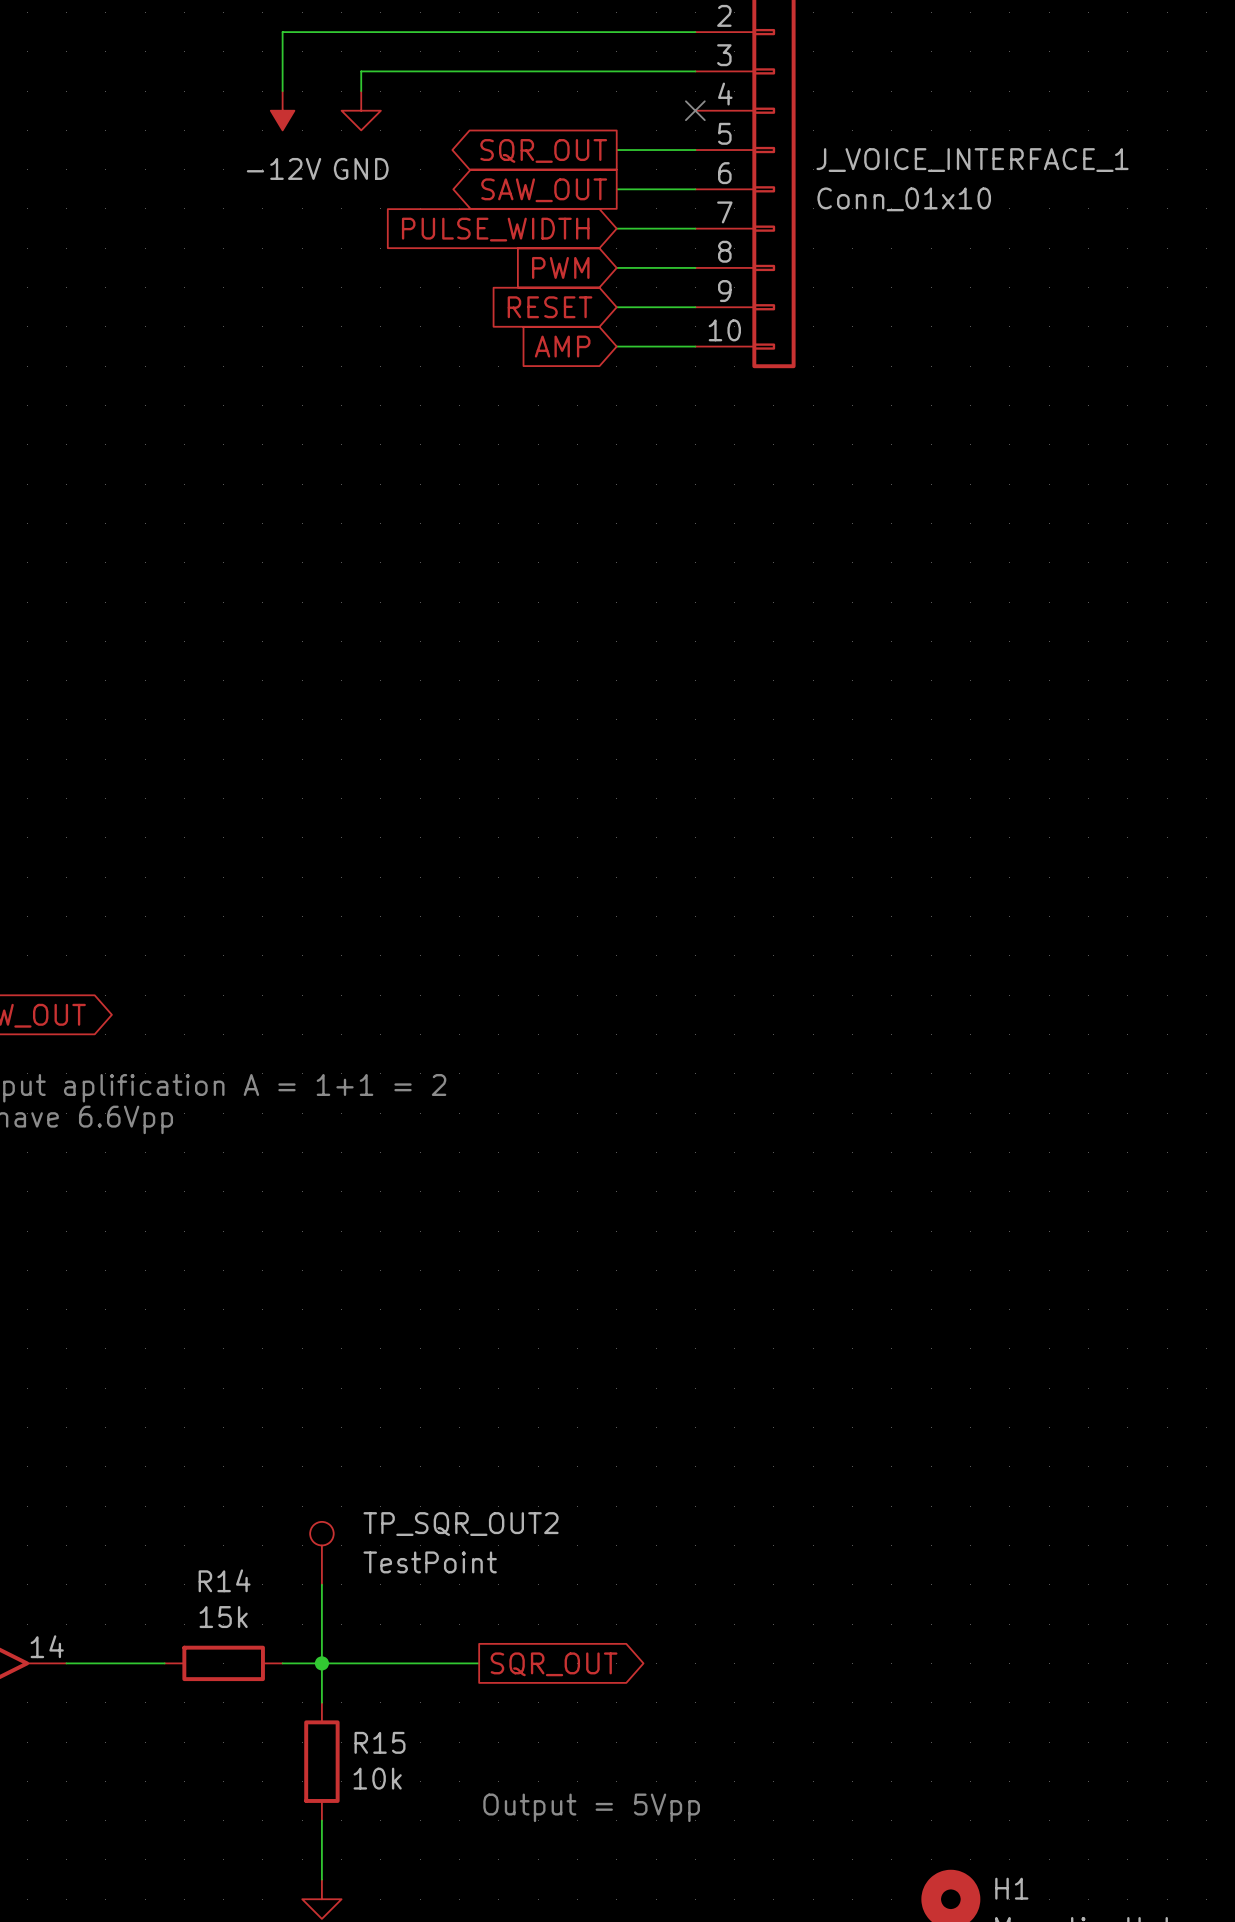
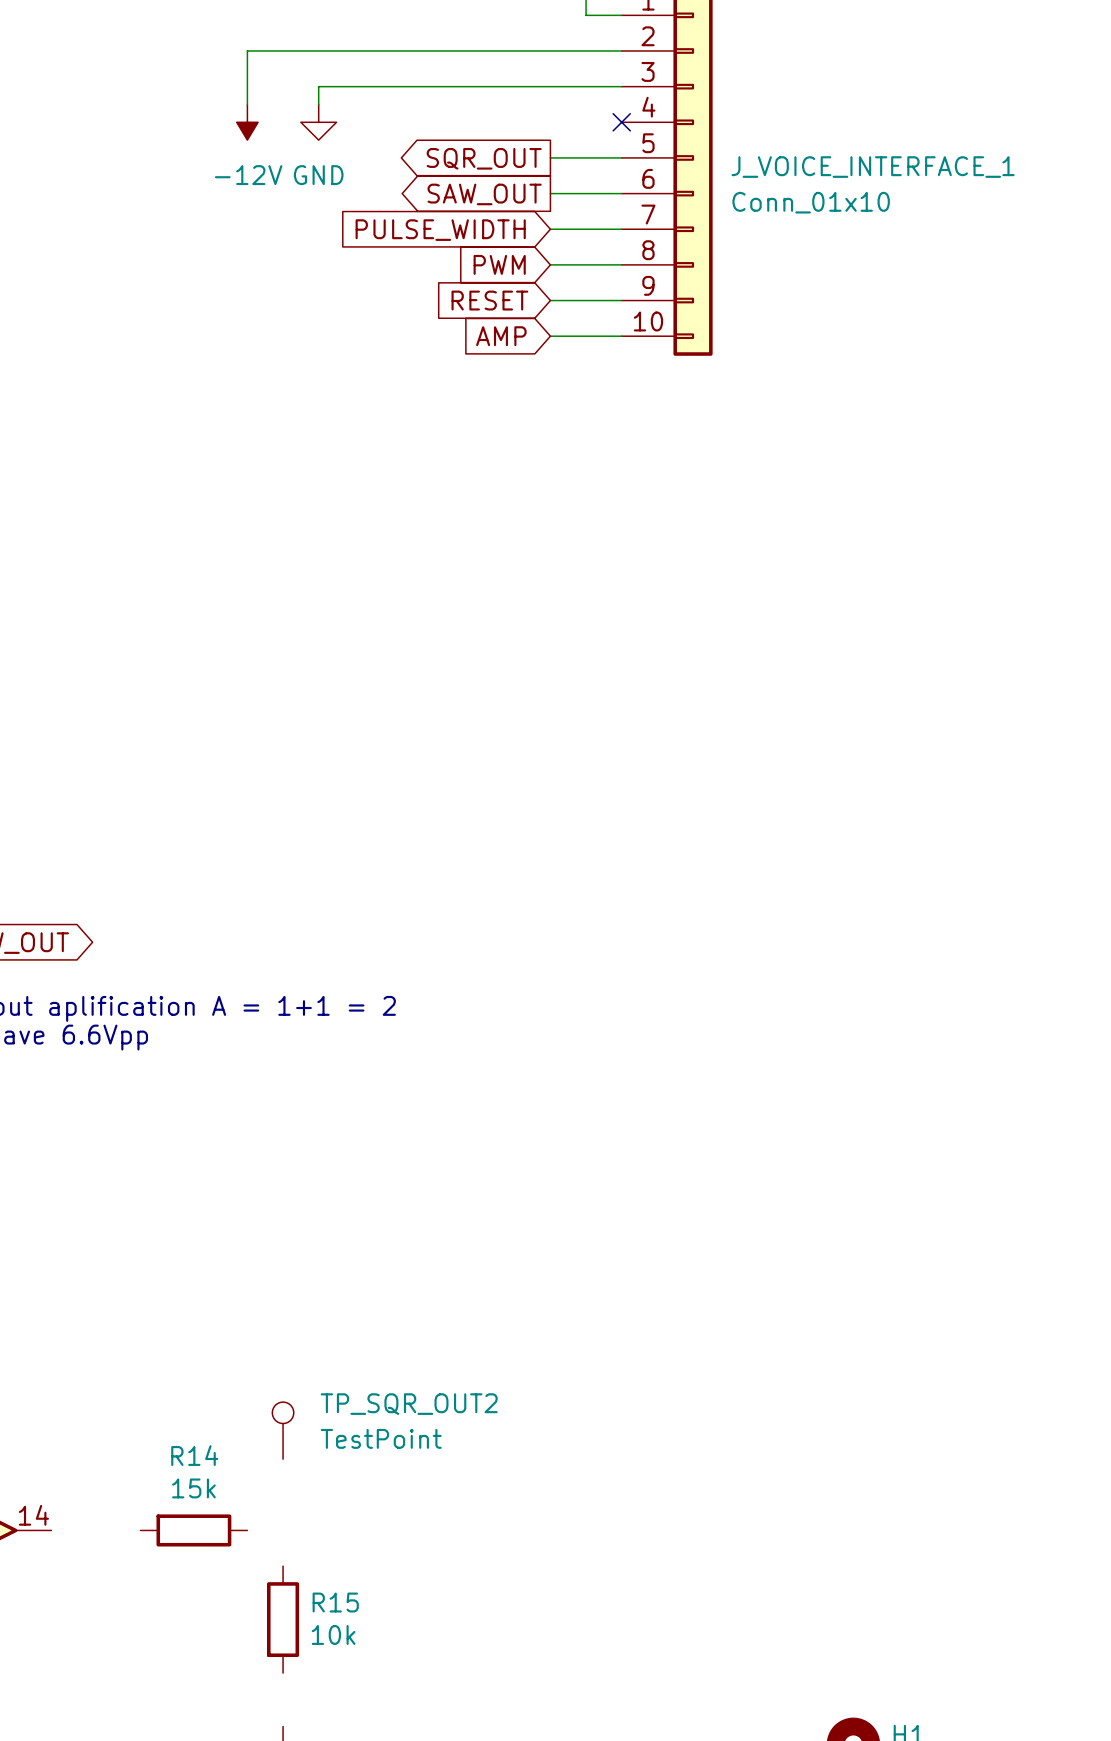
wire: (321, 1584) (321, 1702) -> none
wire: (66, 1663) (164, 1663) -> none
wire: (282, 1663) (479, 1663) -> none
junction: (321, 1663) -> none
global label: SQR_OUT (554, 1664) -> none
text: Output = 5Vpp (591, 1807) -> none
wire: (321, 1820) (321, 1879) -> none

